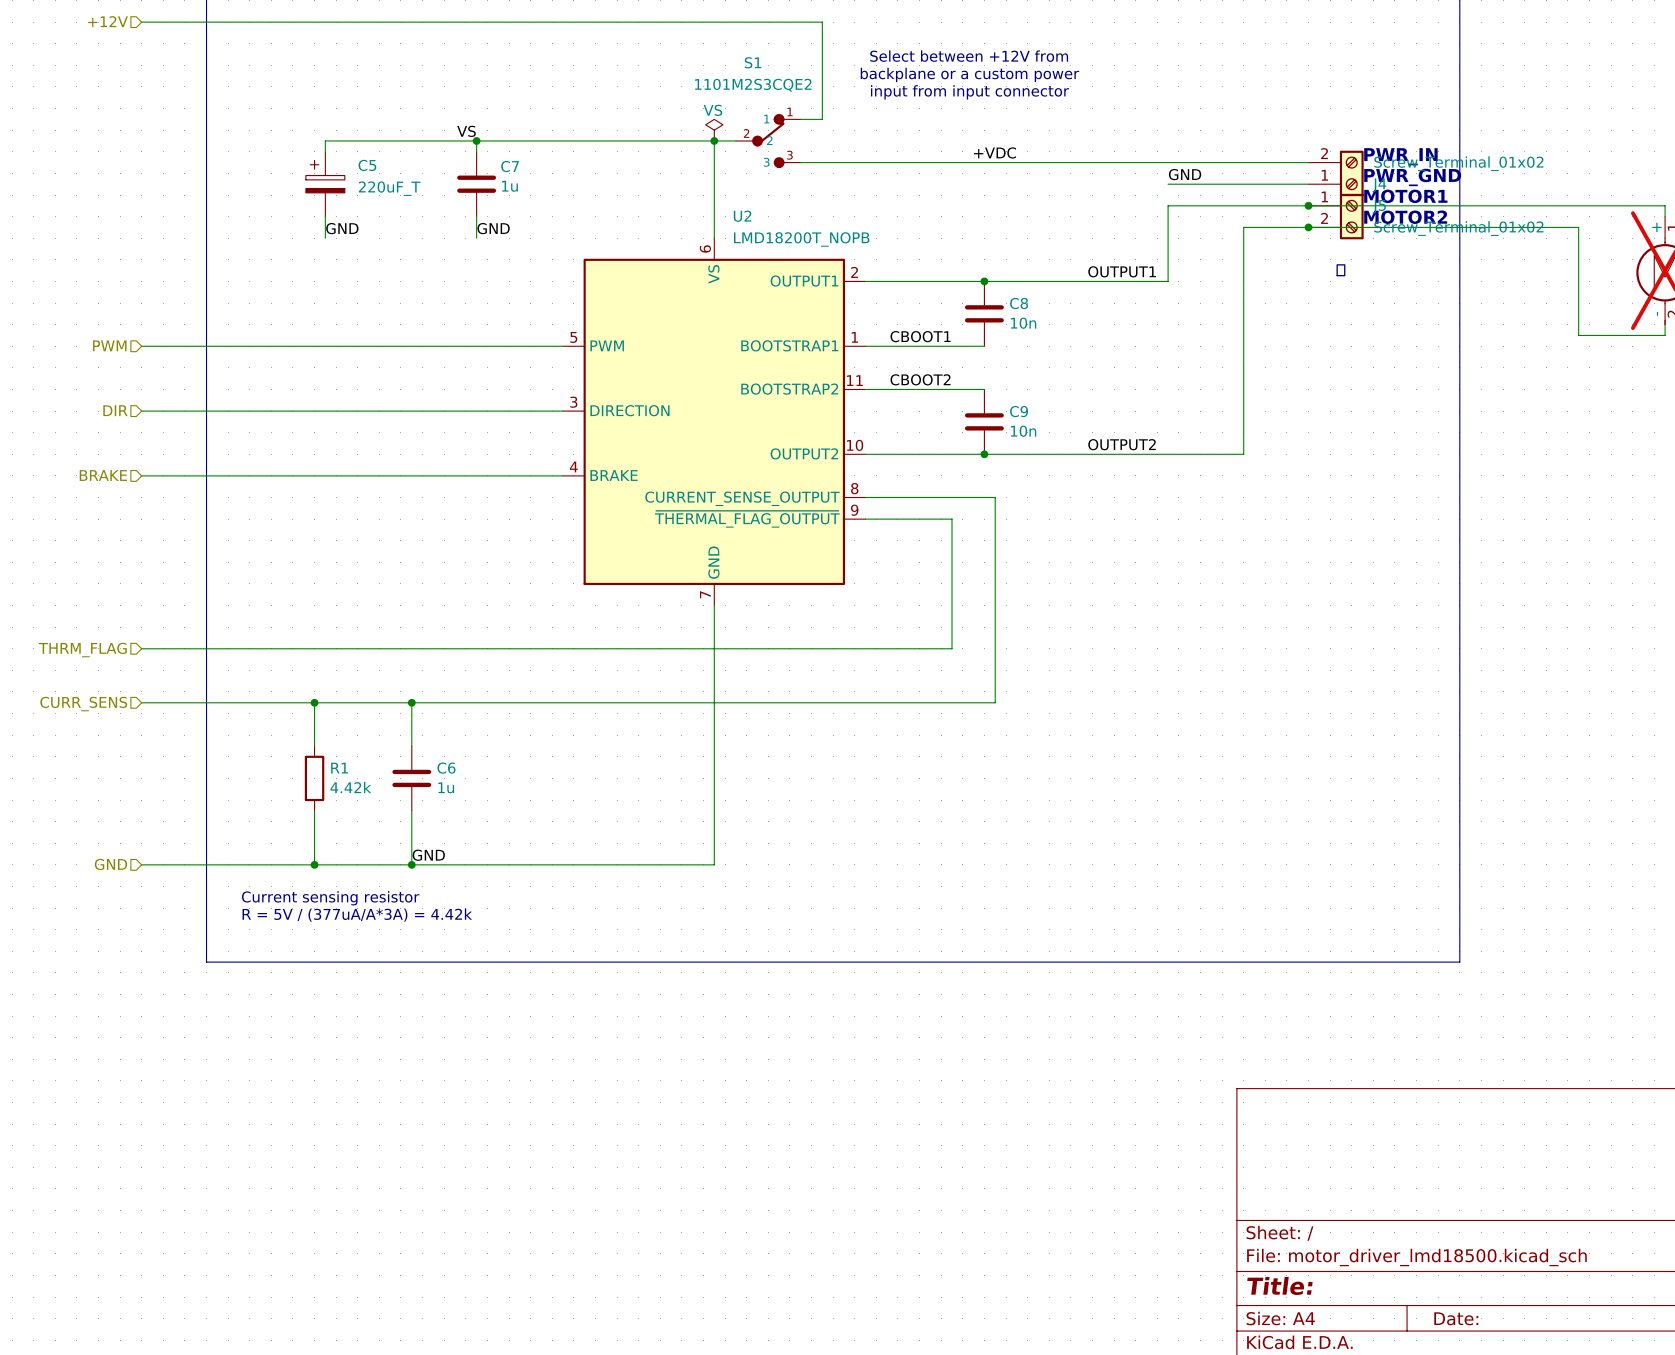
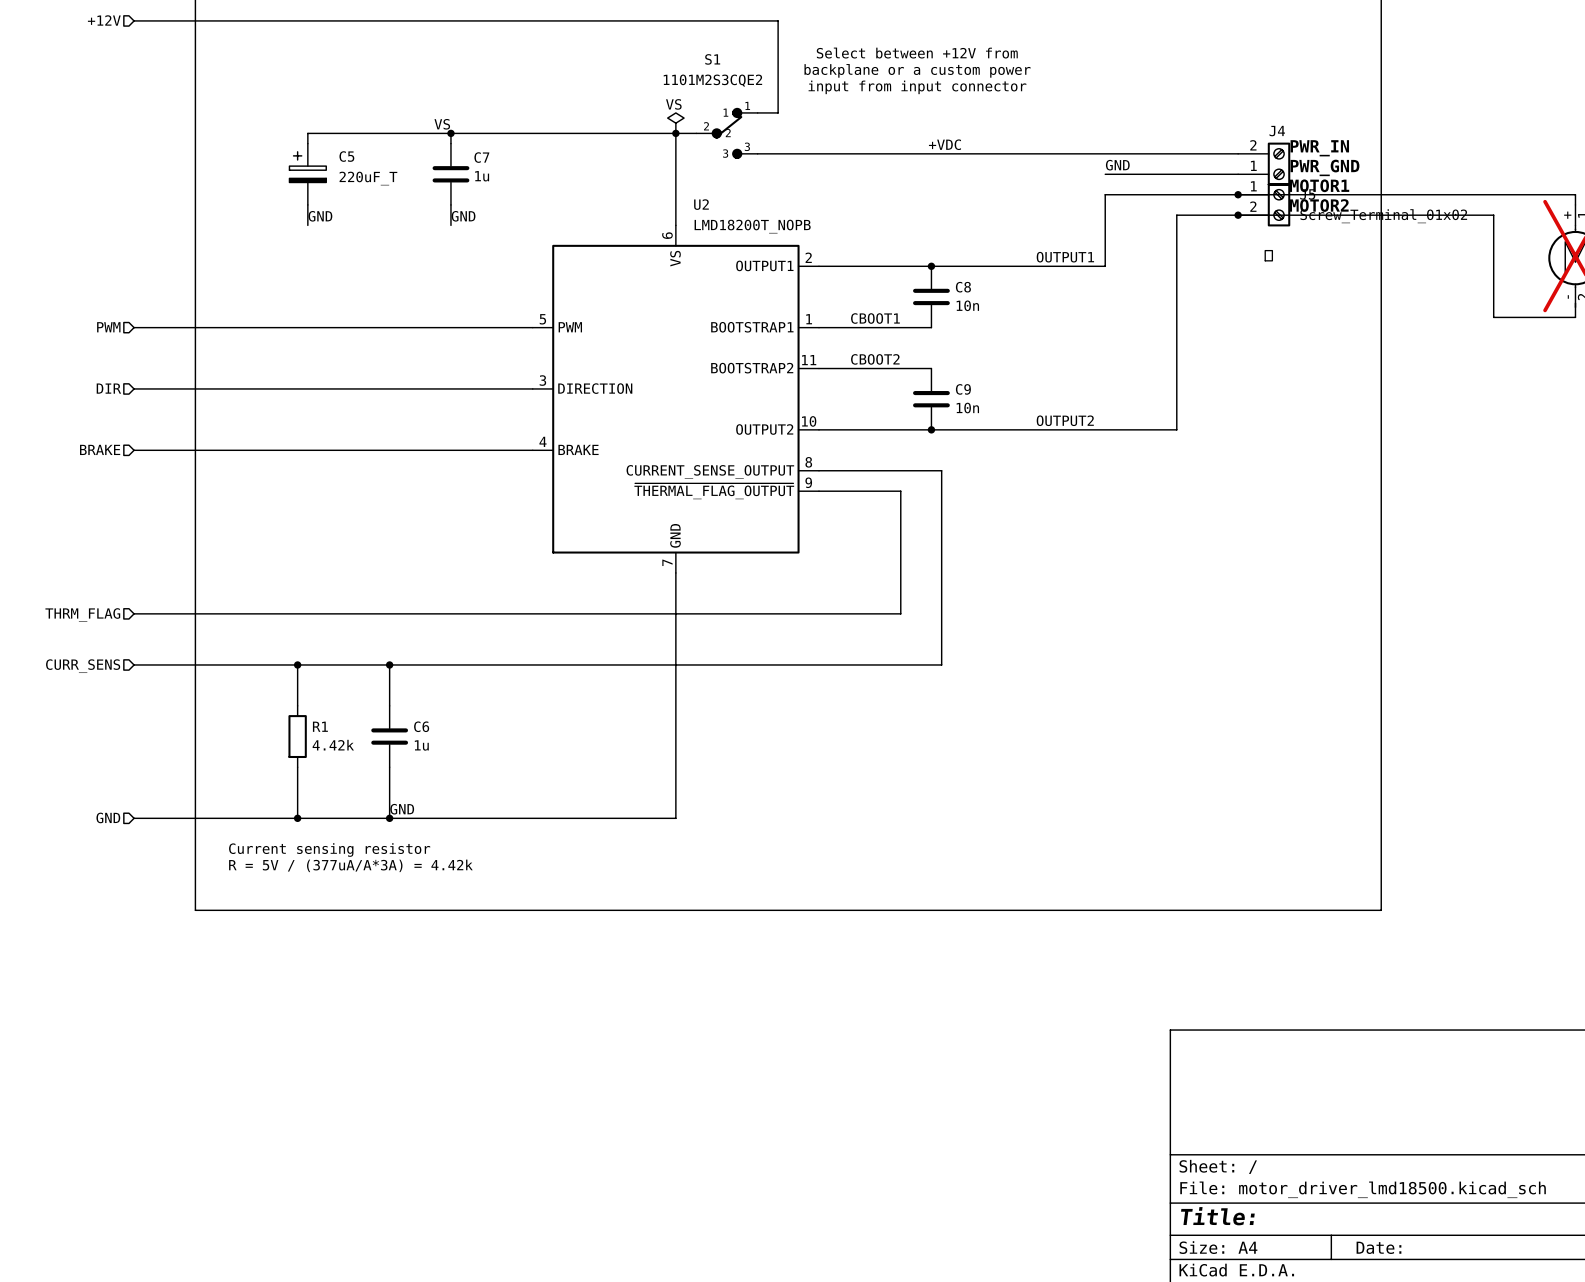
J4 value: Screw_Terminal_01x02 (1458, 163) -> none
J4 name position: J4 (1379, 185) -> J4 (1277, 131)

